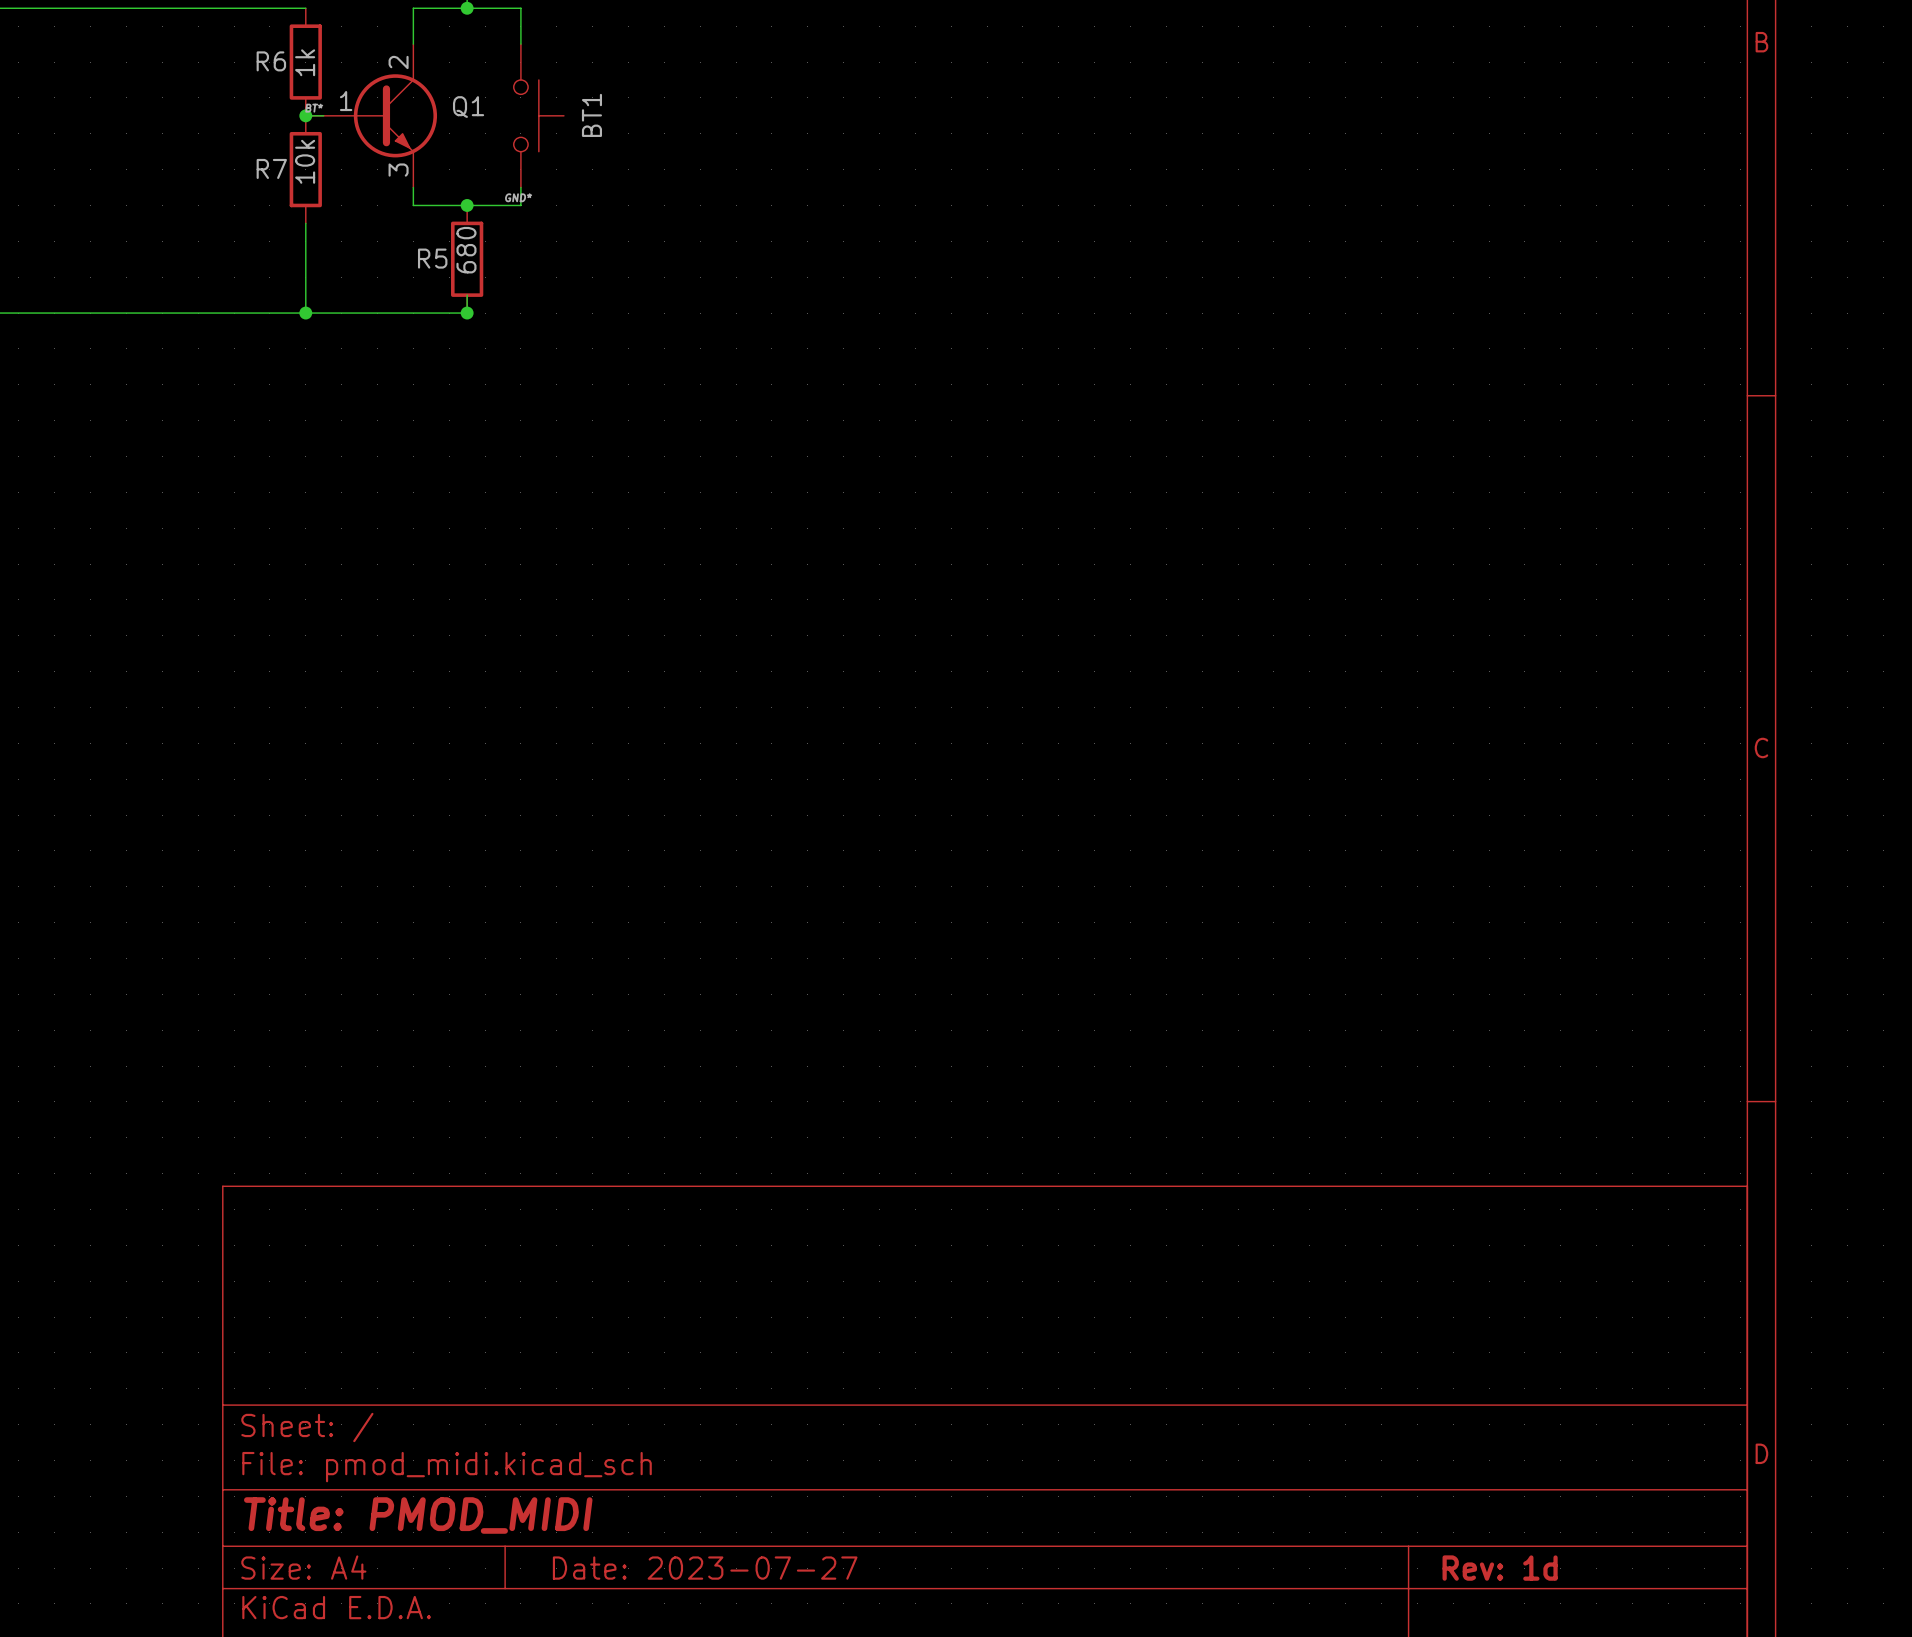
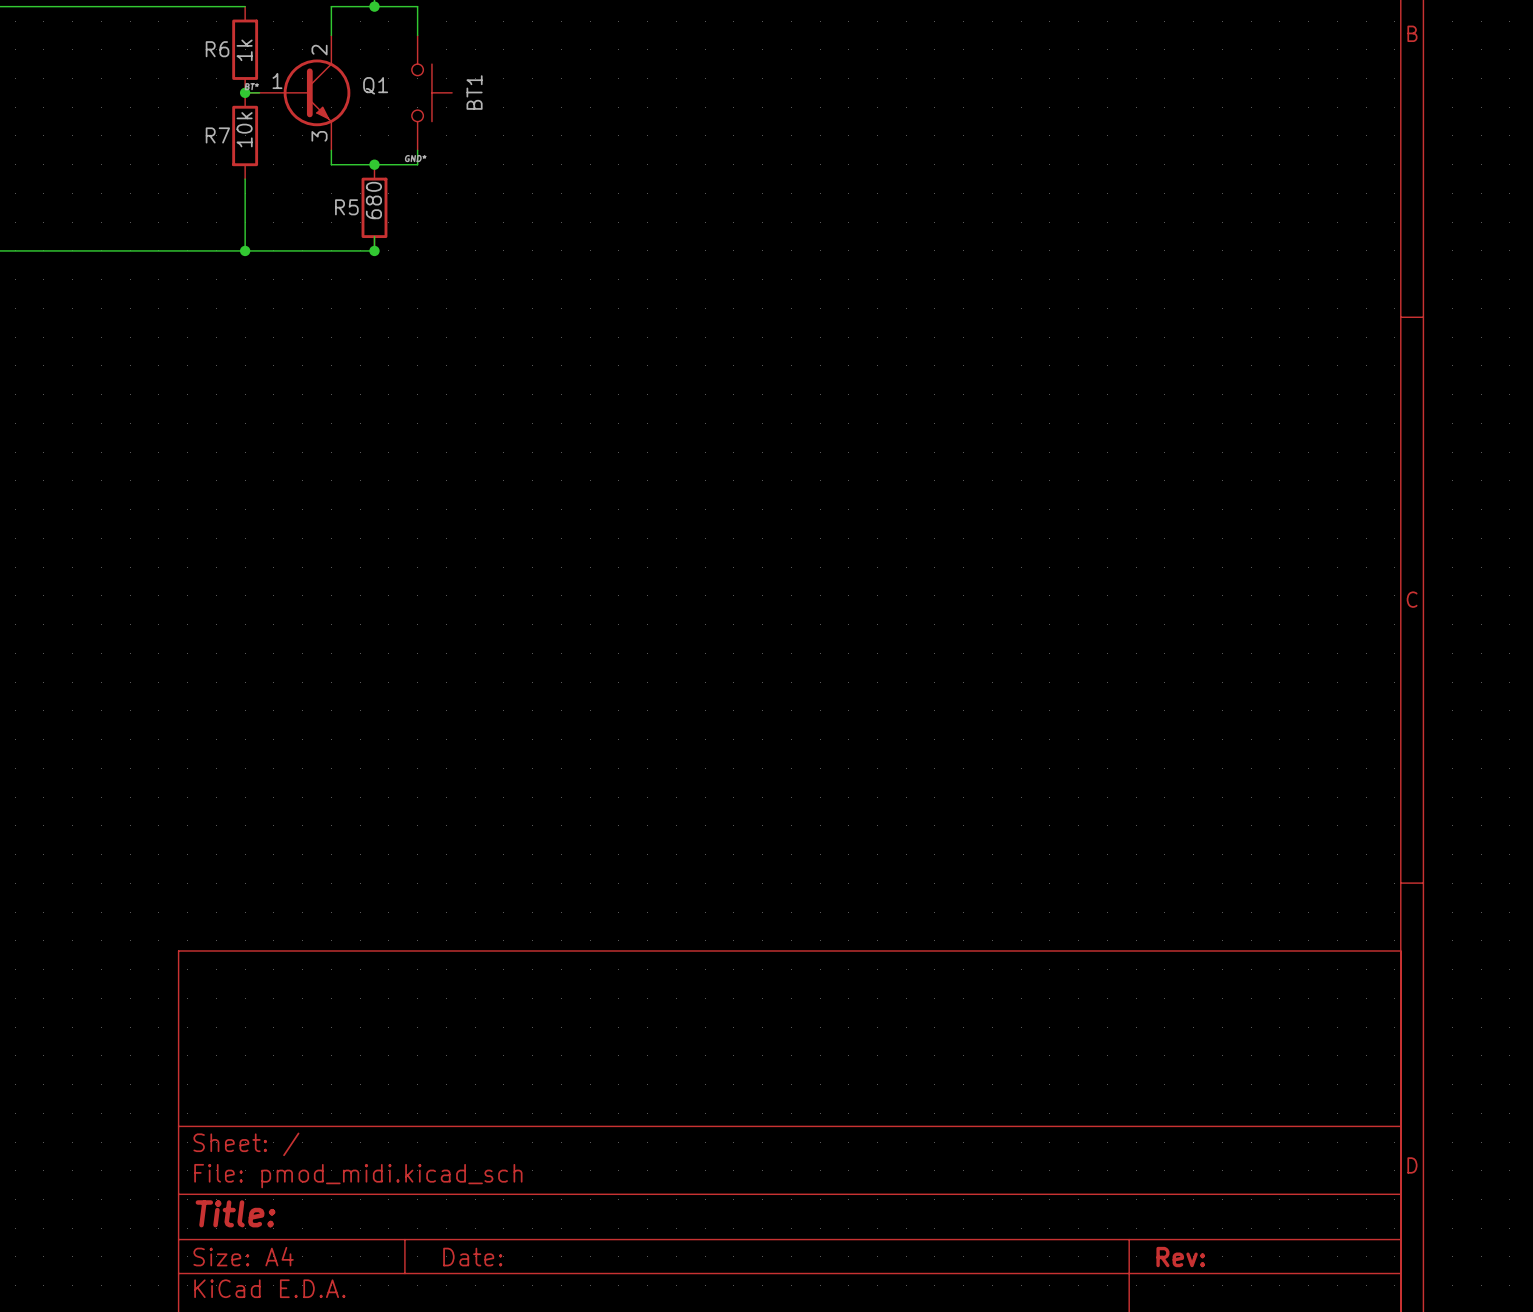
title block: Title: PMOD_MIDI (418, 1515) -> Title: (235, 1213)
title block: Date: 2023-07-27 (705, 1568) -> Date: (472, 1257)
title block: Rev: 1d (1500, 1568) -> Rev: (1180, 1257)

